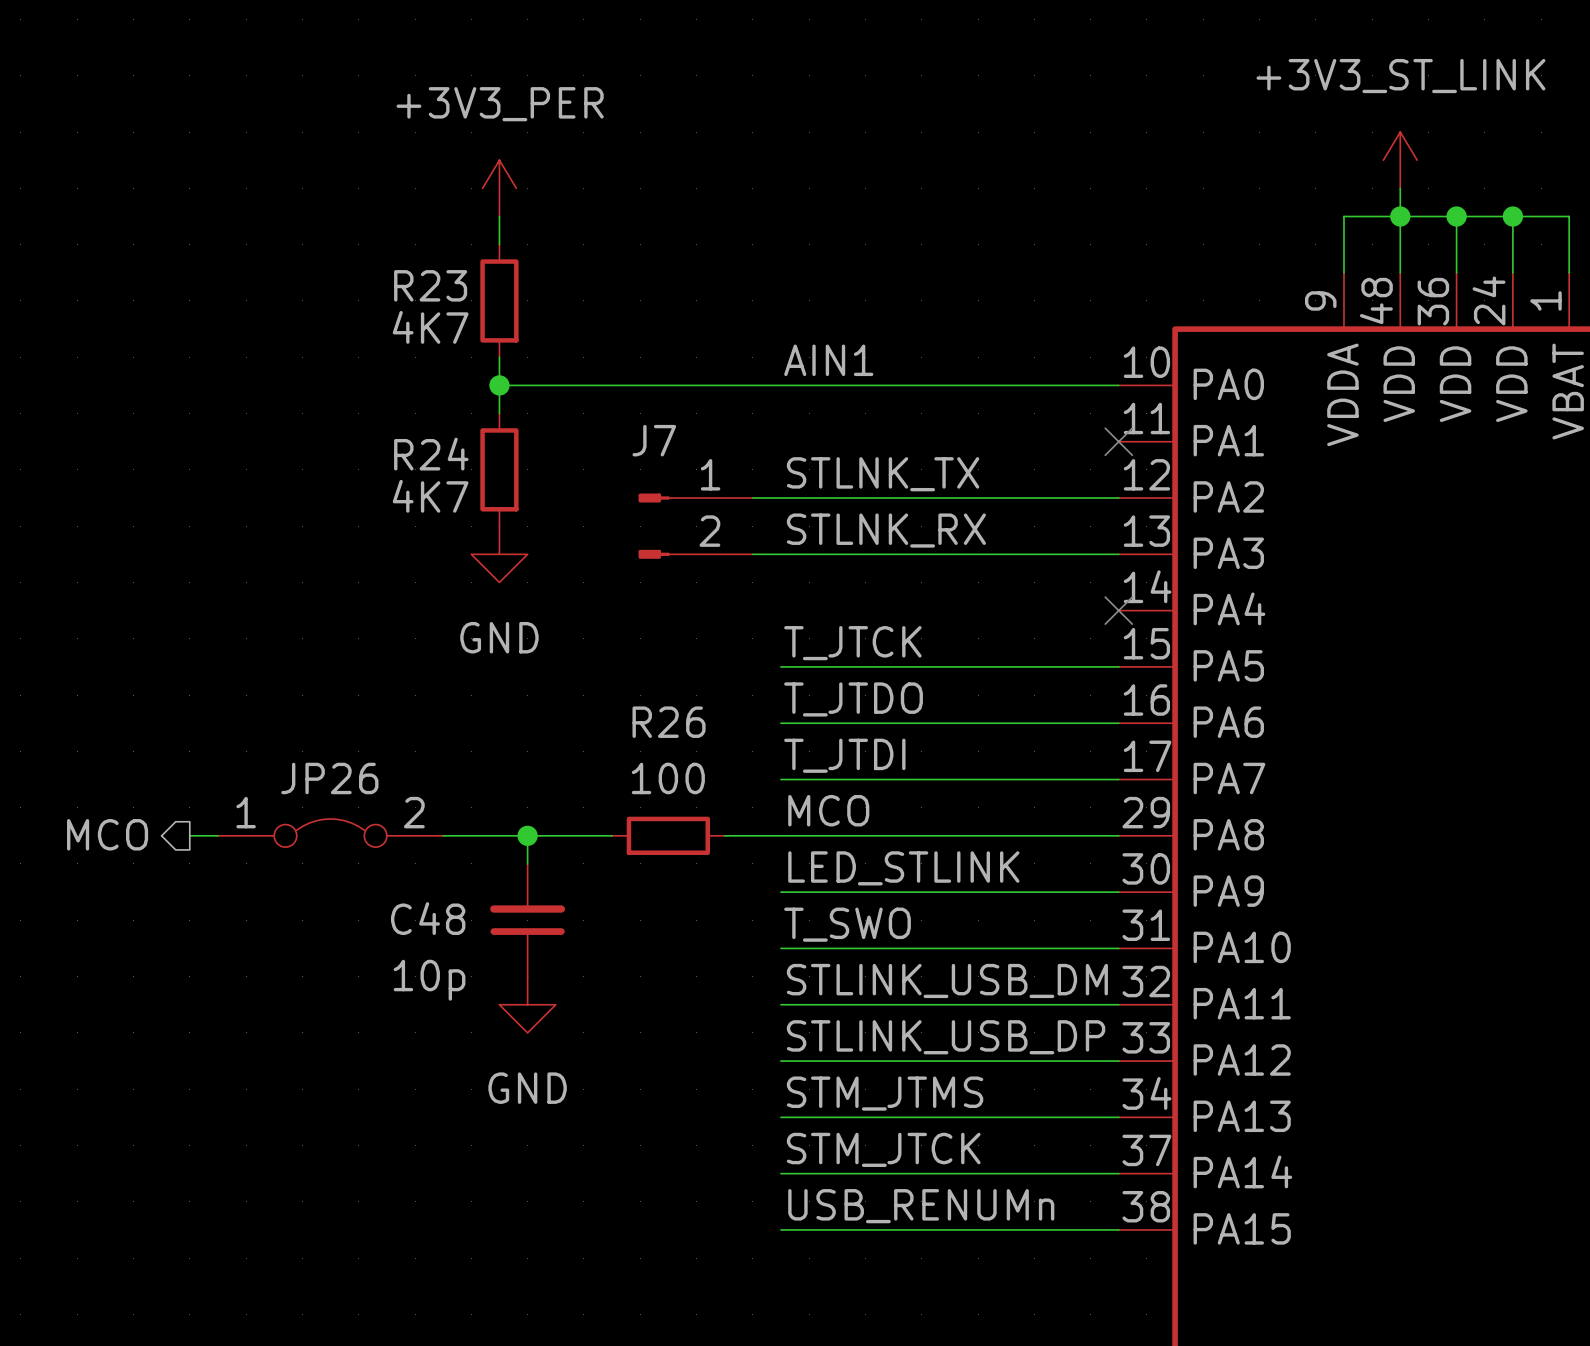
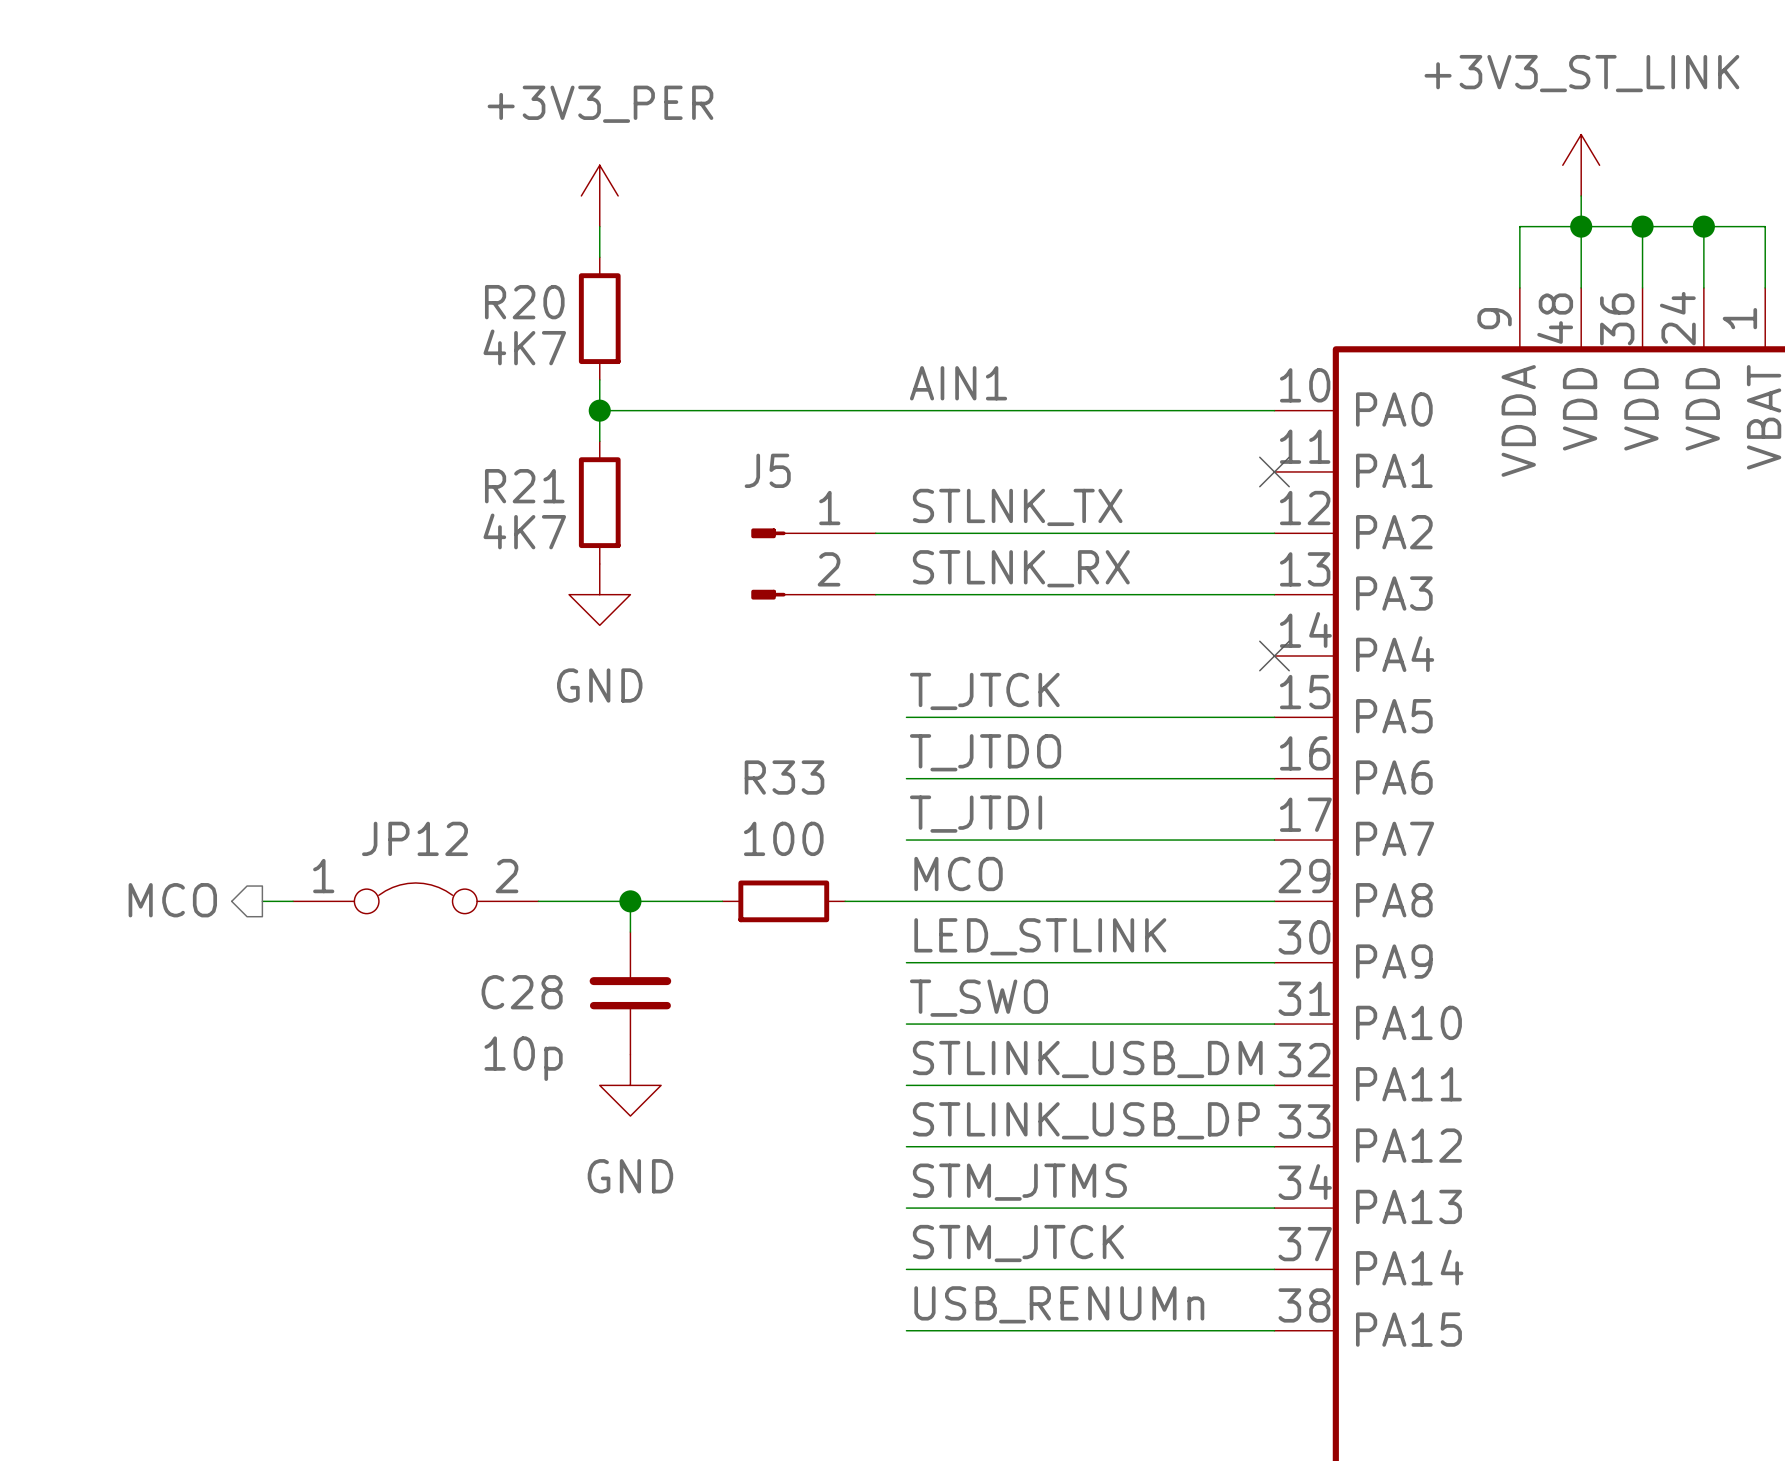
R23 name: R23 (430, 285) -> R20 (524, 302)
J7 name: J7 (654, 440) -> J5 (767, 470)
R24 name: R24 (431, 454) -> R21 (524, 486)
R26 name: R26 (669, 722) -> R33 (784, 777)
JP26 name: JP26 (329, 778) -> JP12 (415, 838)
C48 name: C48 (428, 918) -> C28 (522, 992)

